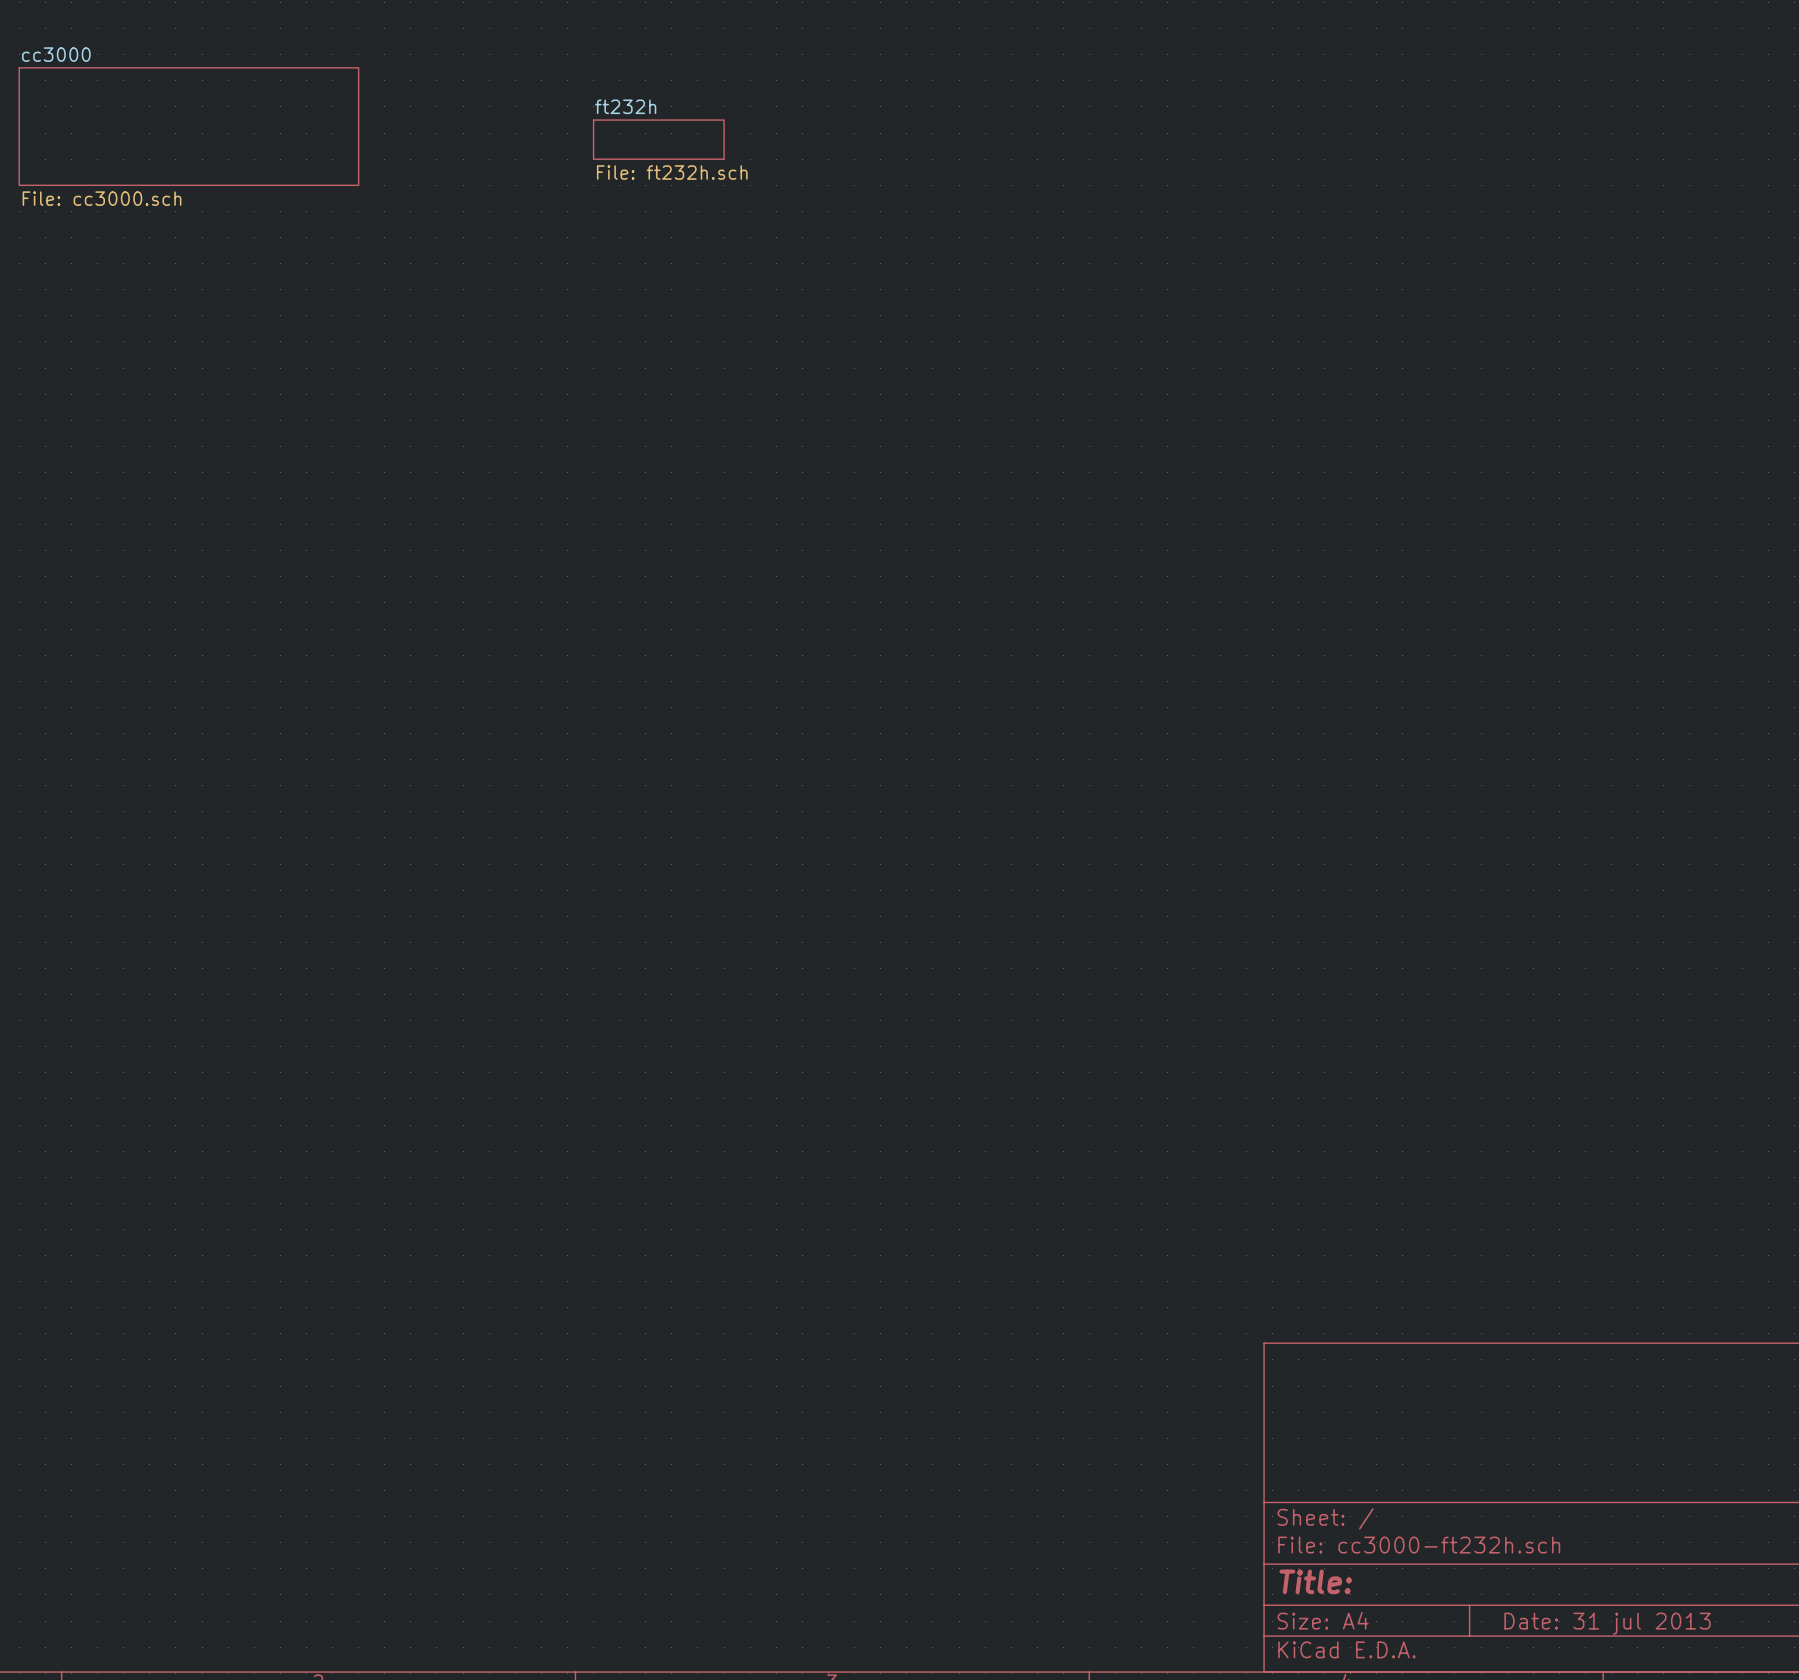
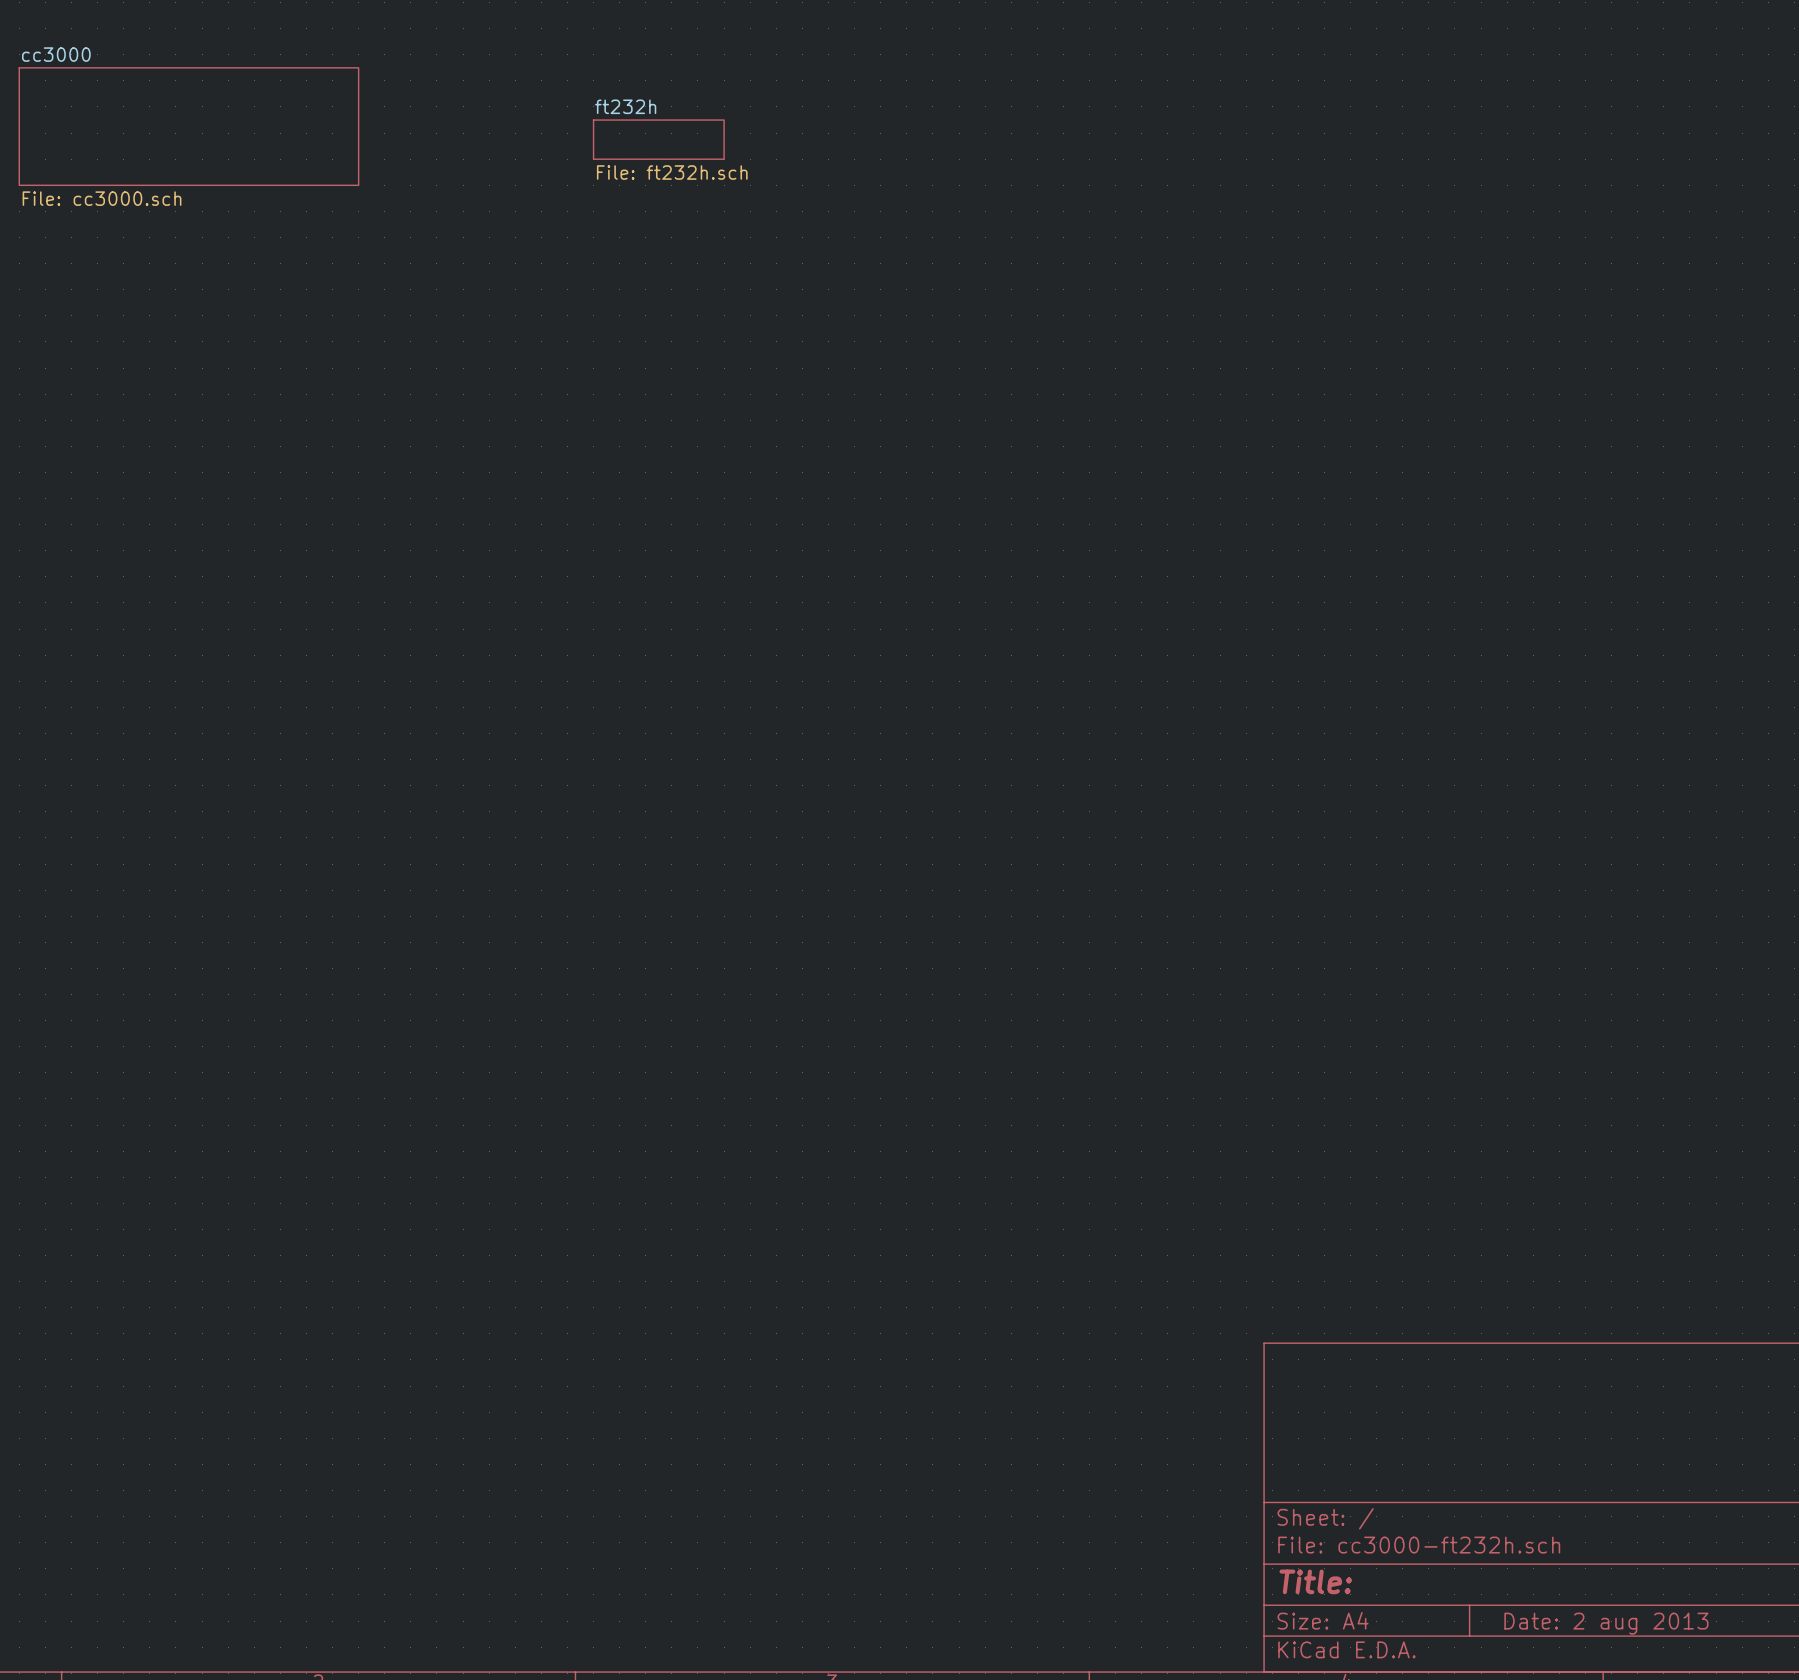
title block: Date: 31 jul 2013 (1607, 1623) -> Date: 2 aug 2013 (1606, 1623)

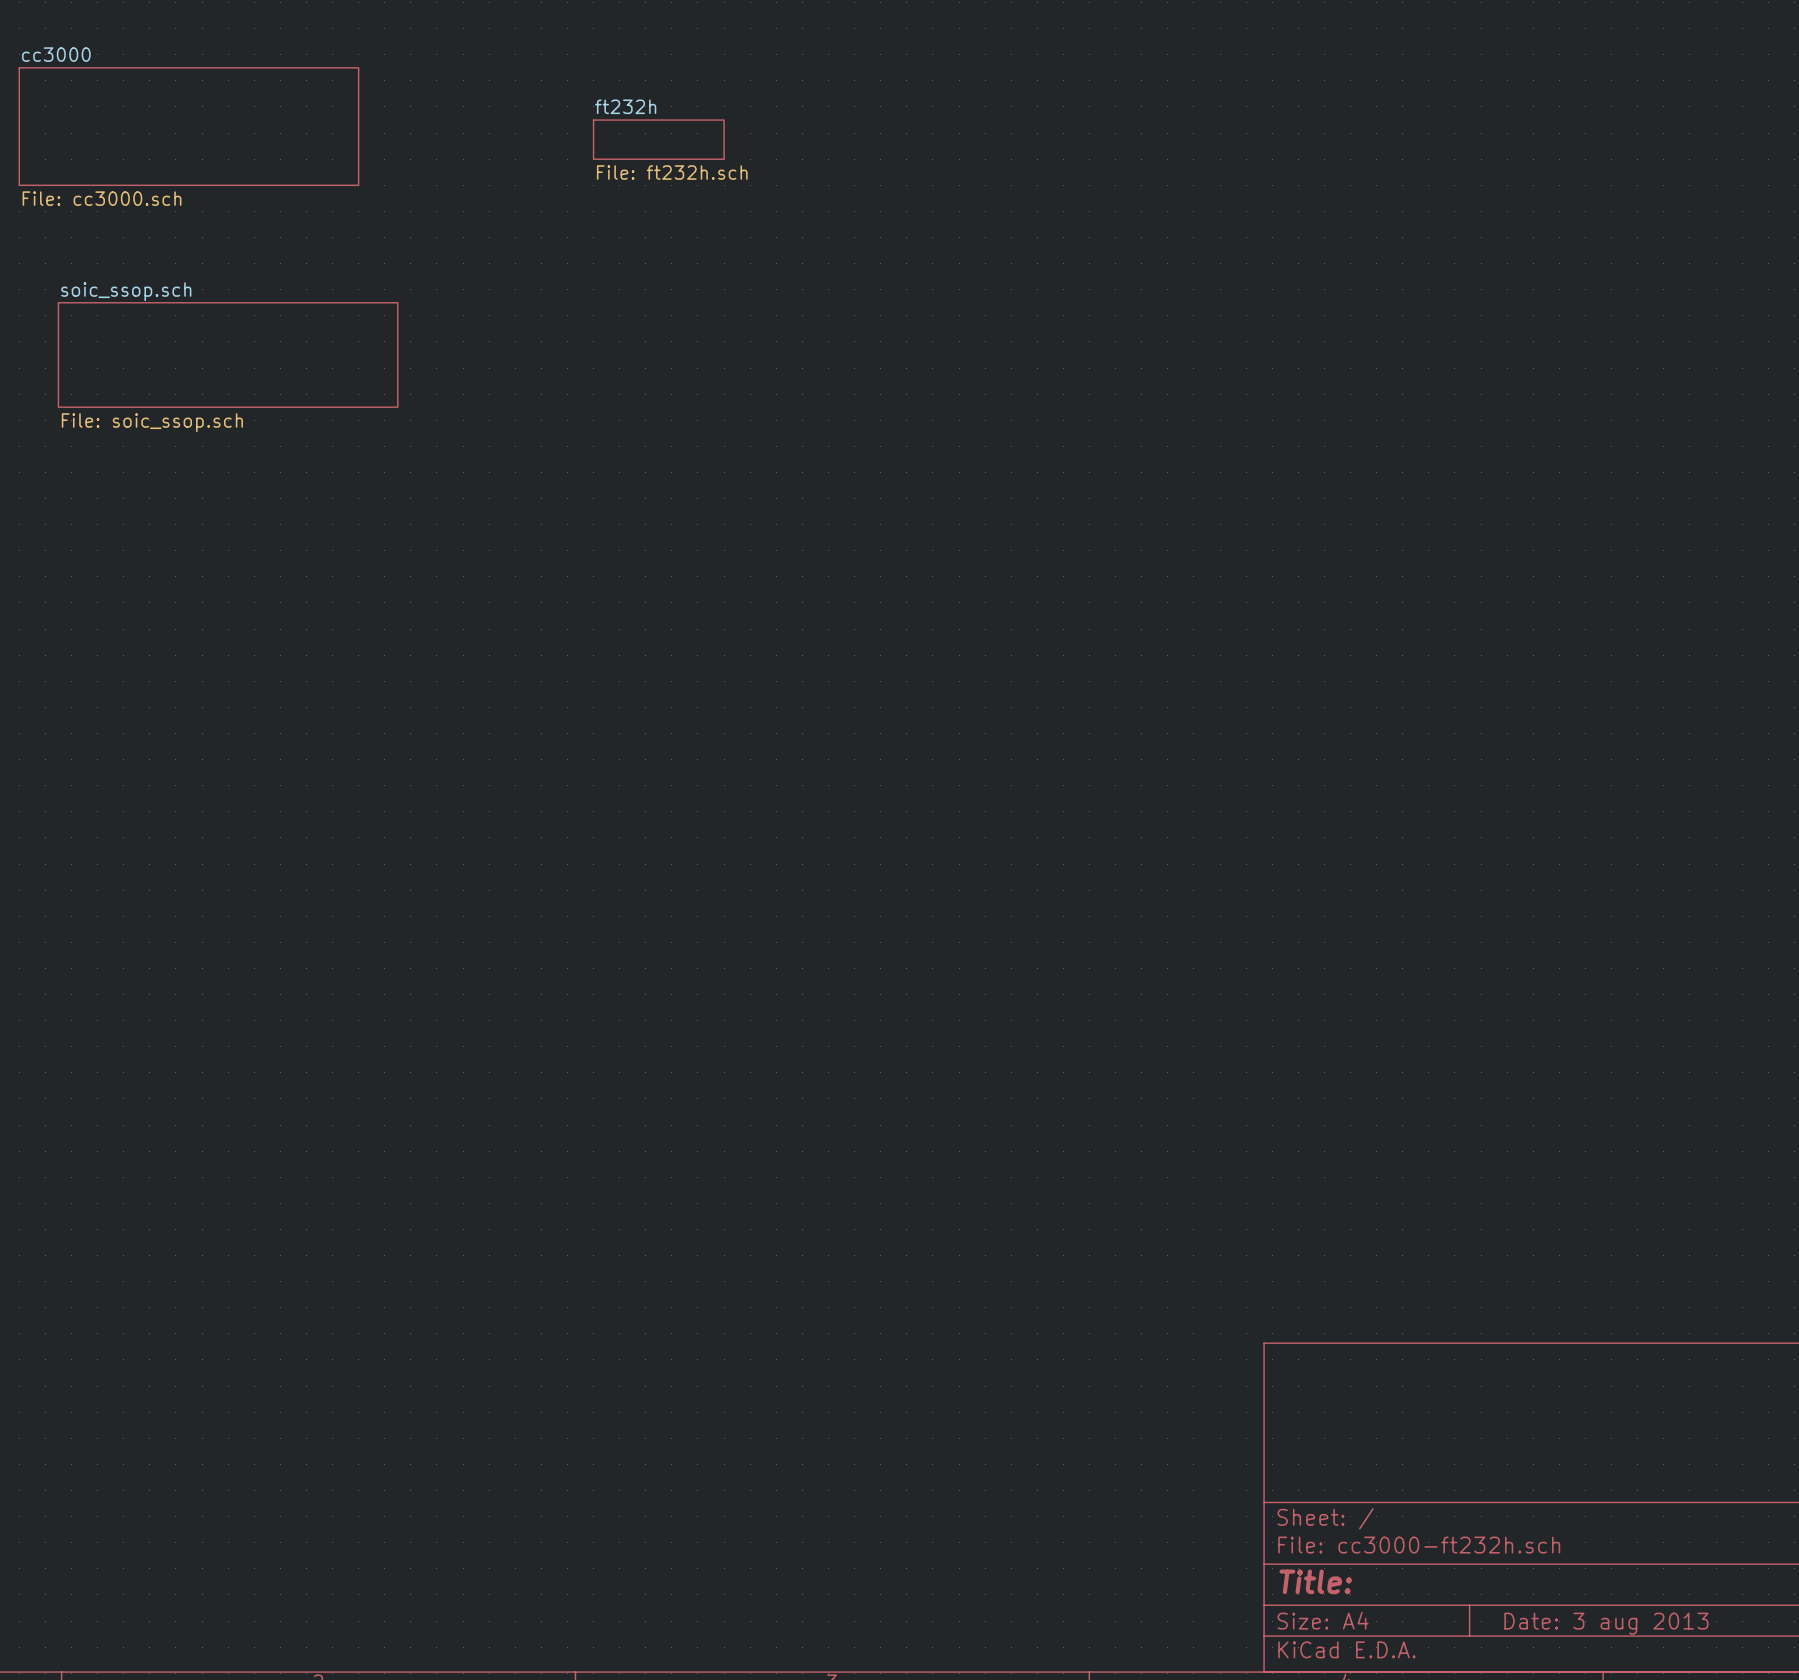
sheet soic_ssop.sch: none -> File: soic_ssop.sch (228, 354)
title block: Date: 2 aug 2013 (1606, 1623) -> Date: 3 aug 2013 (1606, 1623)

